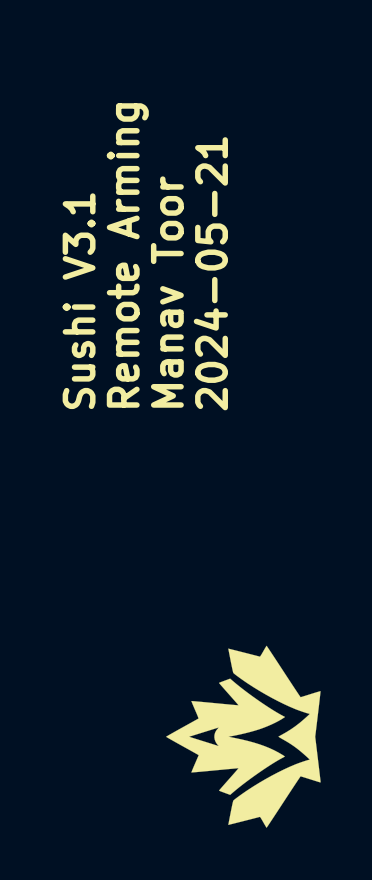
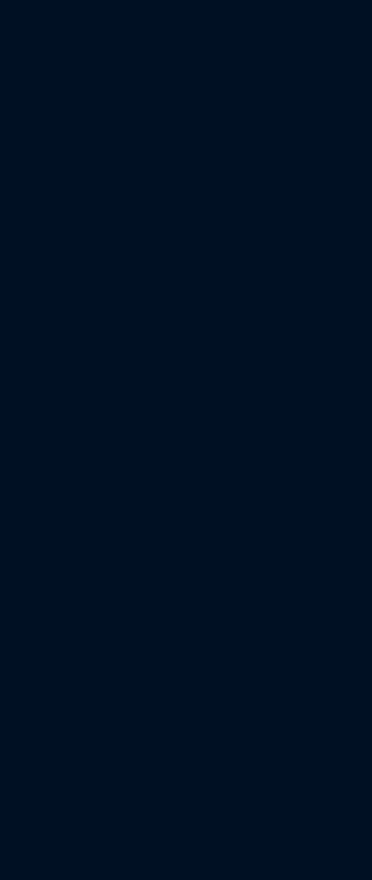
text: Remote Arming (127, 255) -> none
text: 2024-05-21 (210, 273) -> none
text: Manav Toor (167, 292) -> none
text: Sushi V3.1 (79, 301) -> none
drawing: [166, 645, 321, 828] -> none

